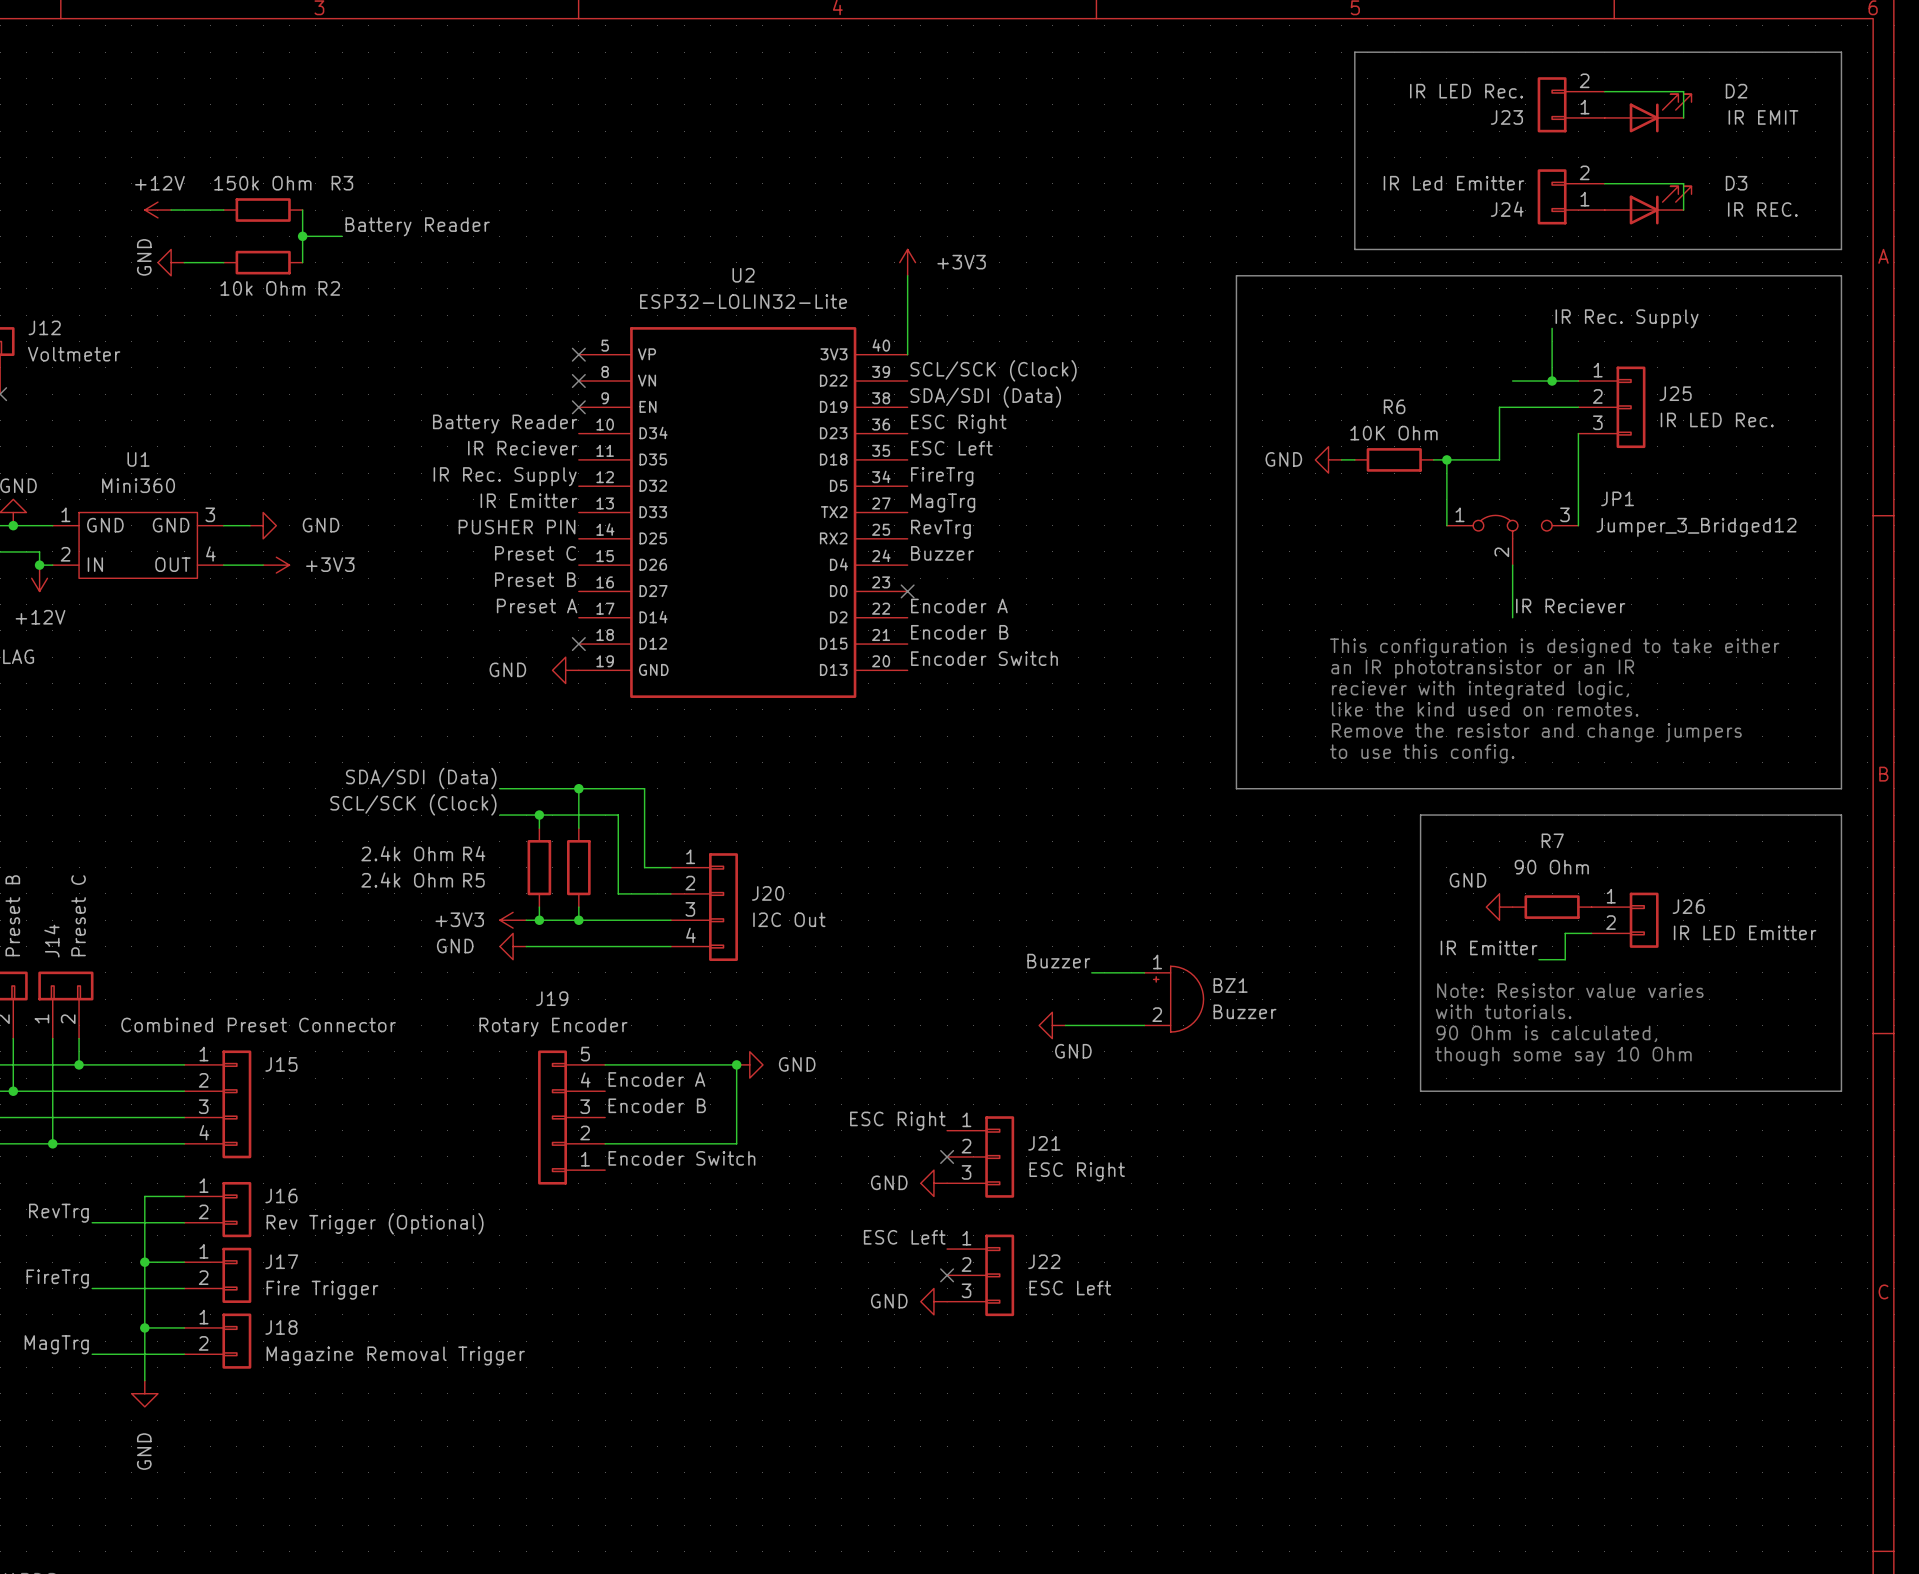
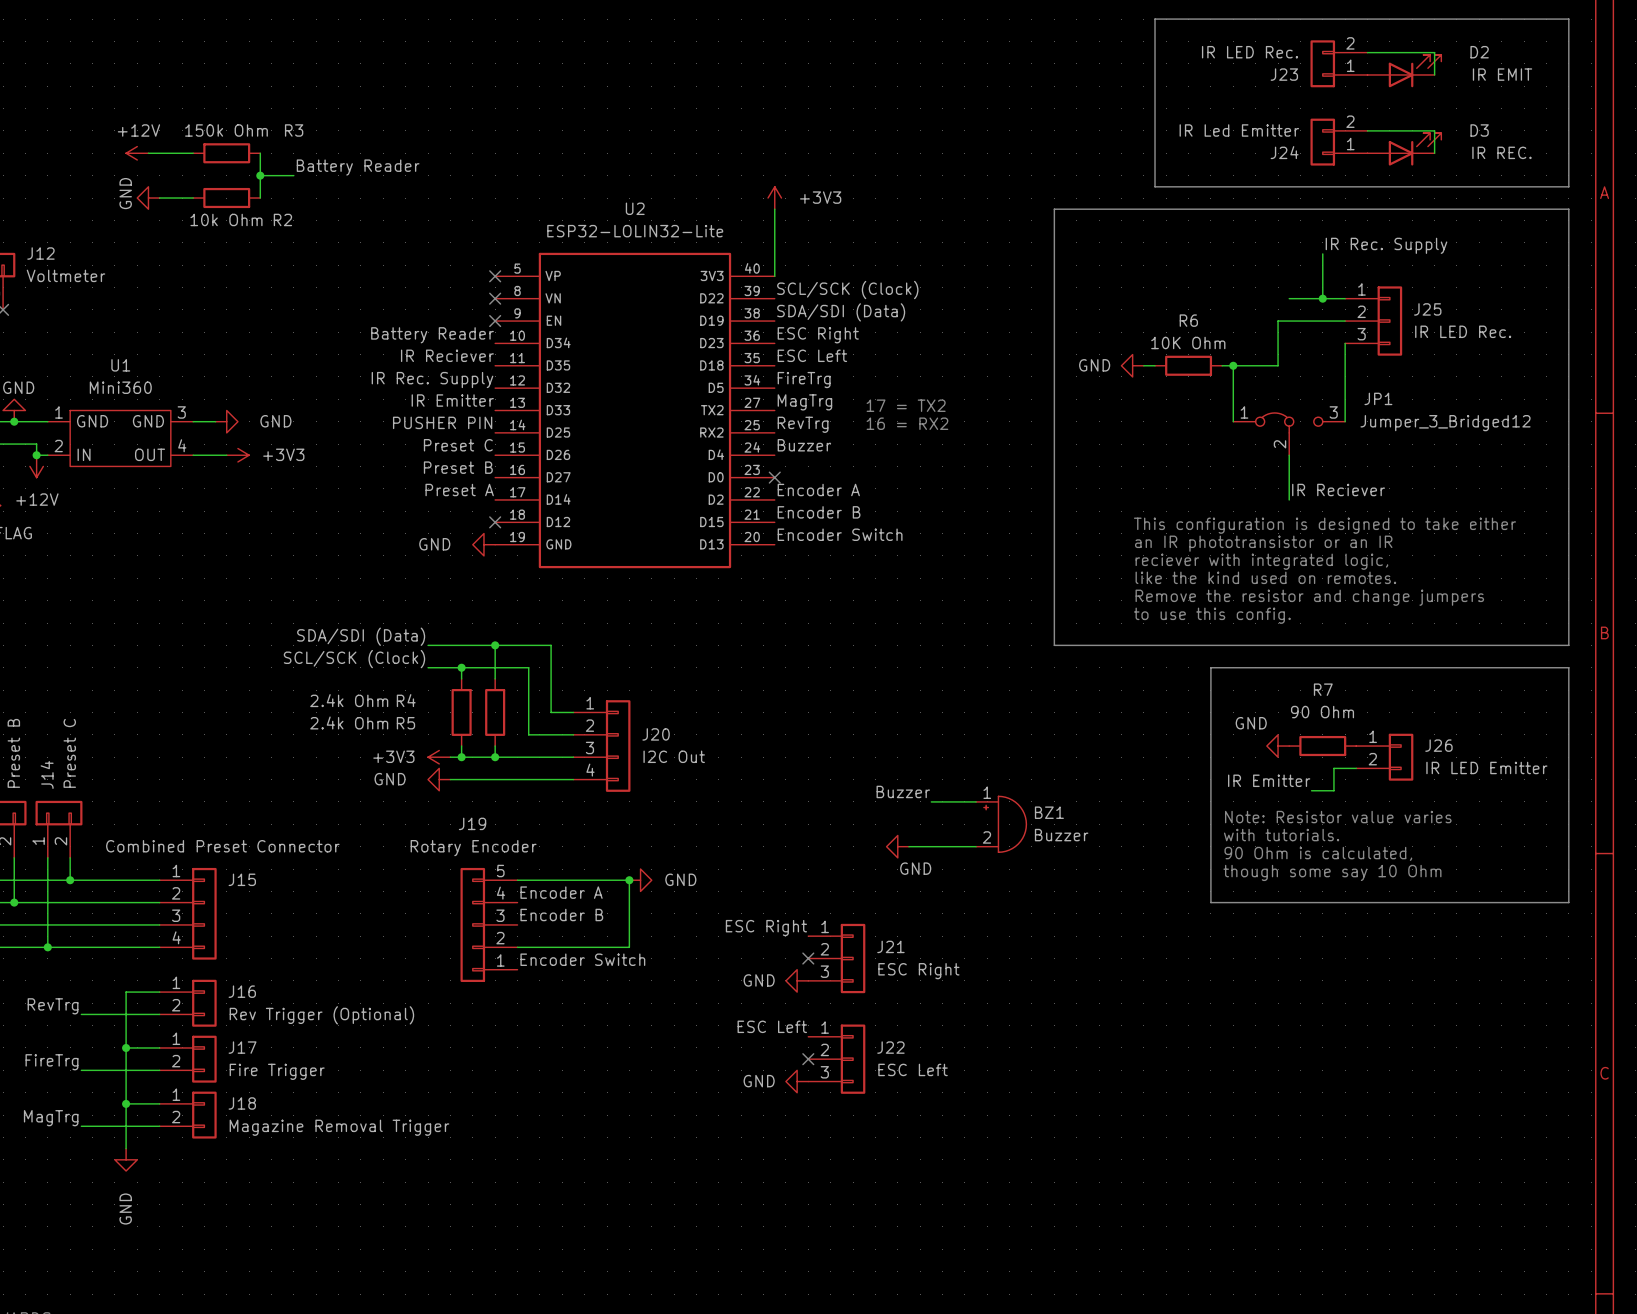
text: none -> 17 = TX2 (906, 405)
text: none -> 16 = RX2 (907, 423)

